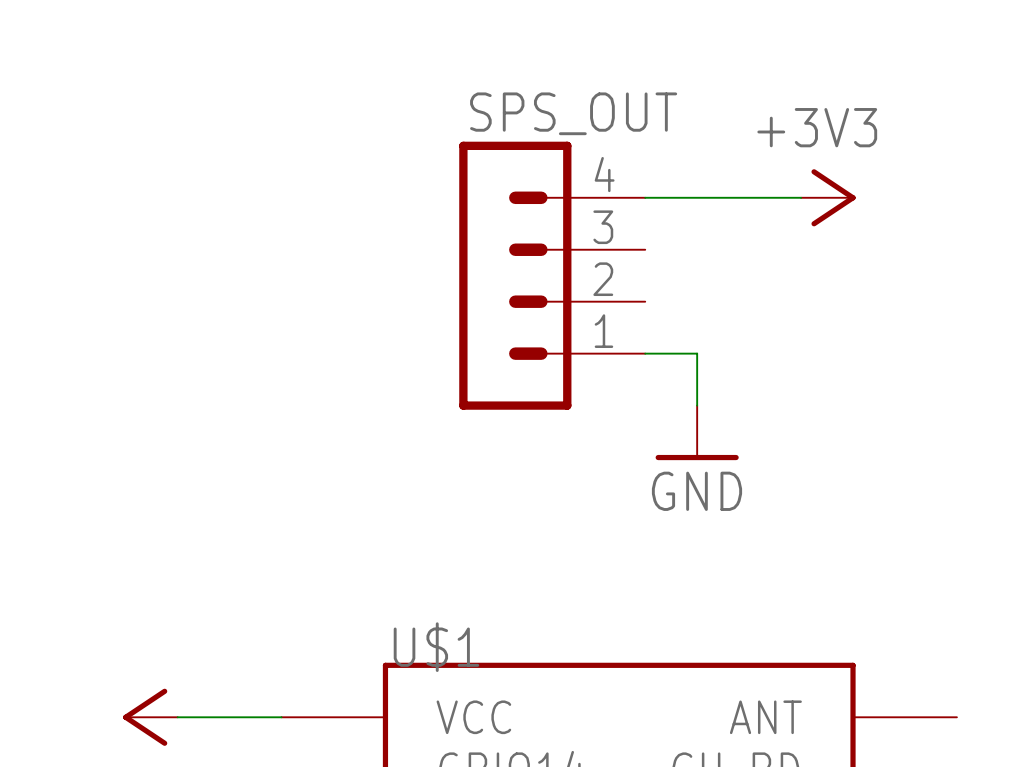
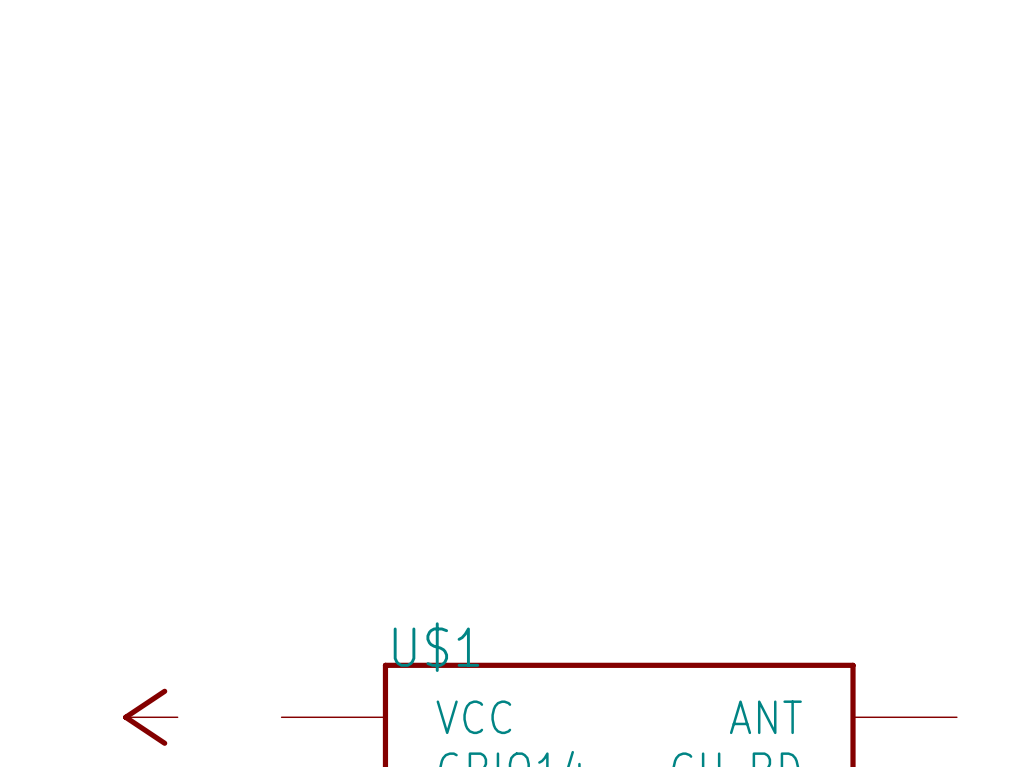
wire: (645, 197) (801, 197) -> none
power symbol: +3V3 (828, 197) -> none
SPS_OUT: (552, 275) -> none
wire: (645, 353) (697, 353) (697, 405) -> none
power symbol: GND (697, 432) -> none
wire: (177, 717) (281, 717) -> none

